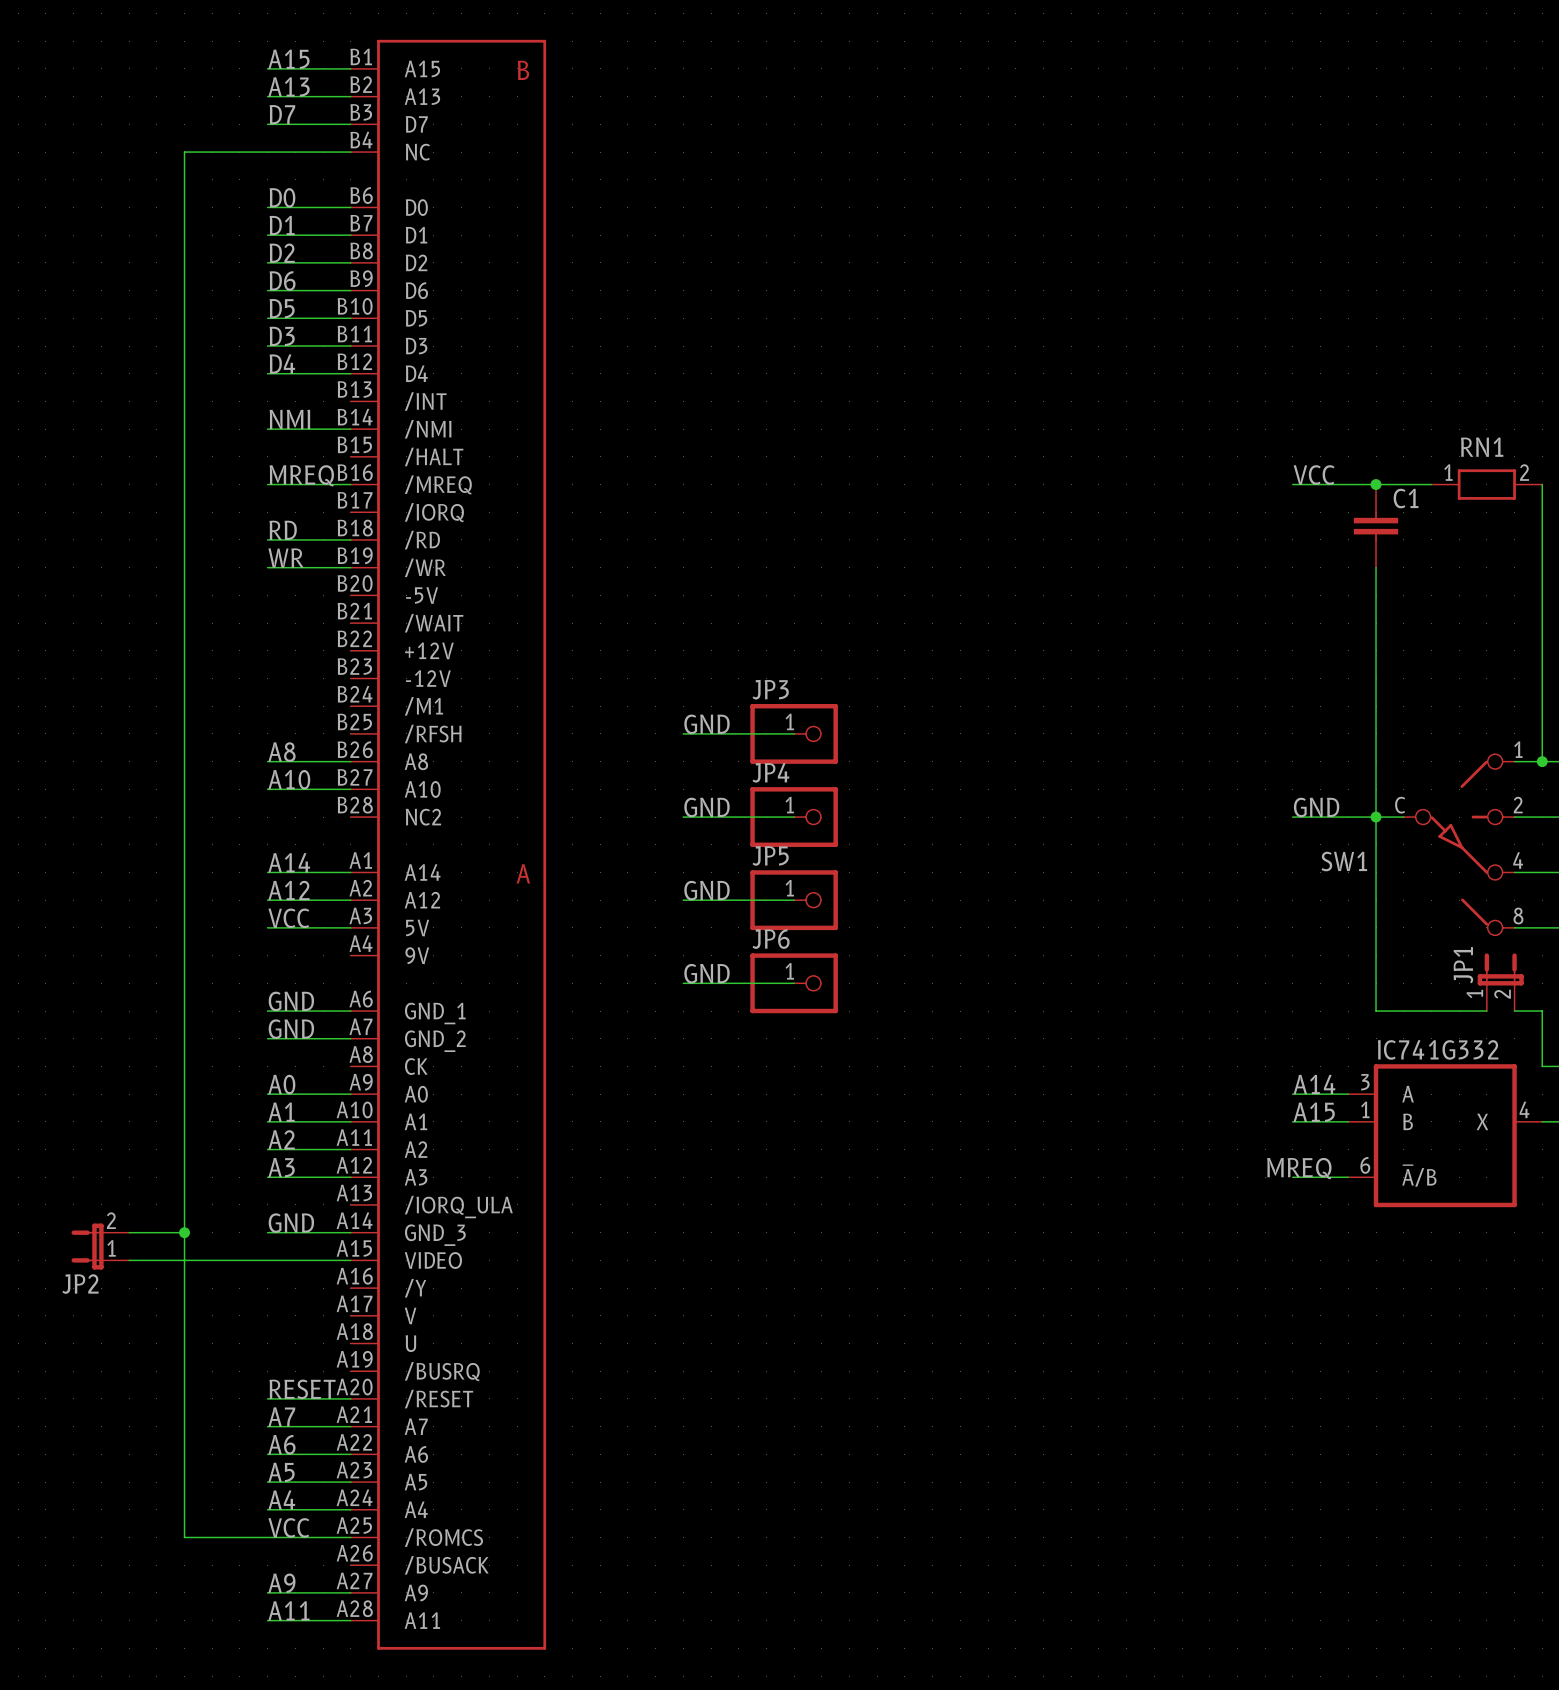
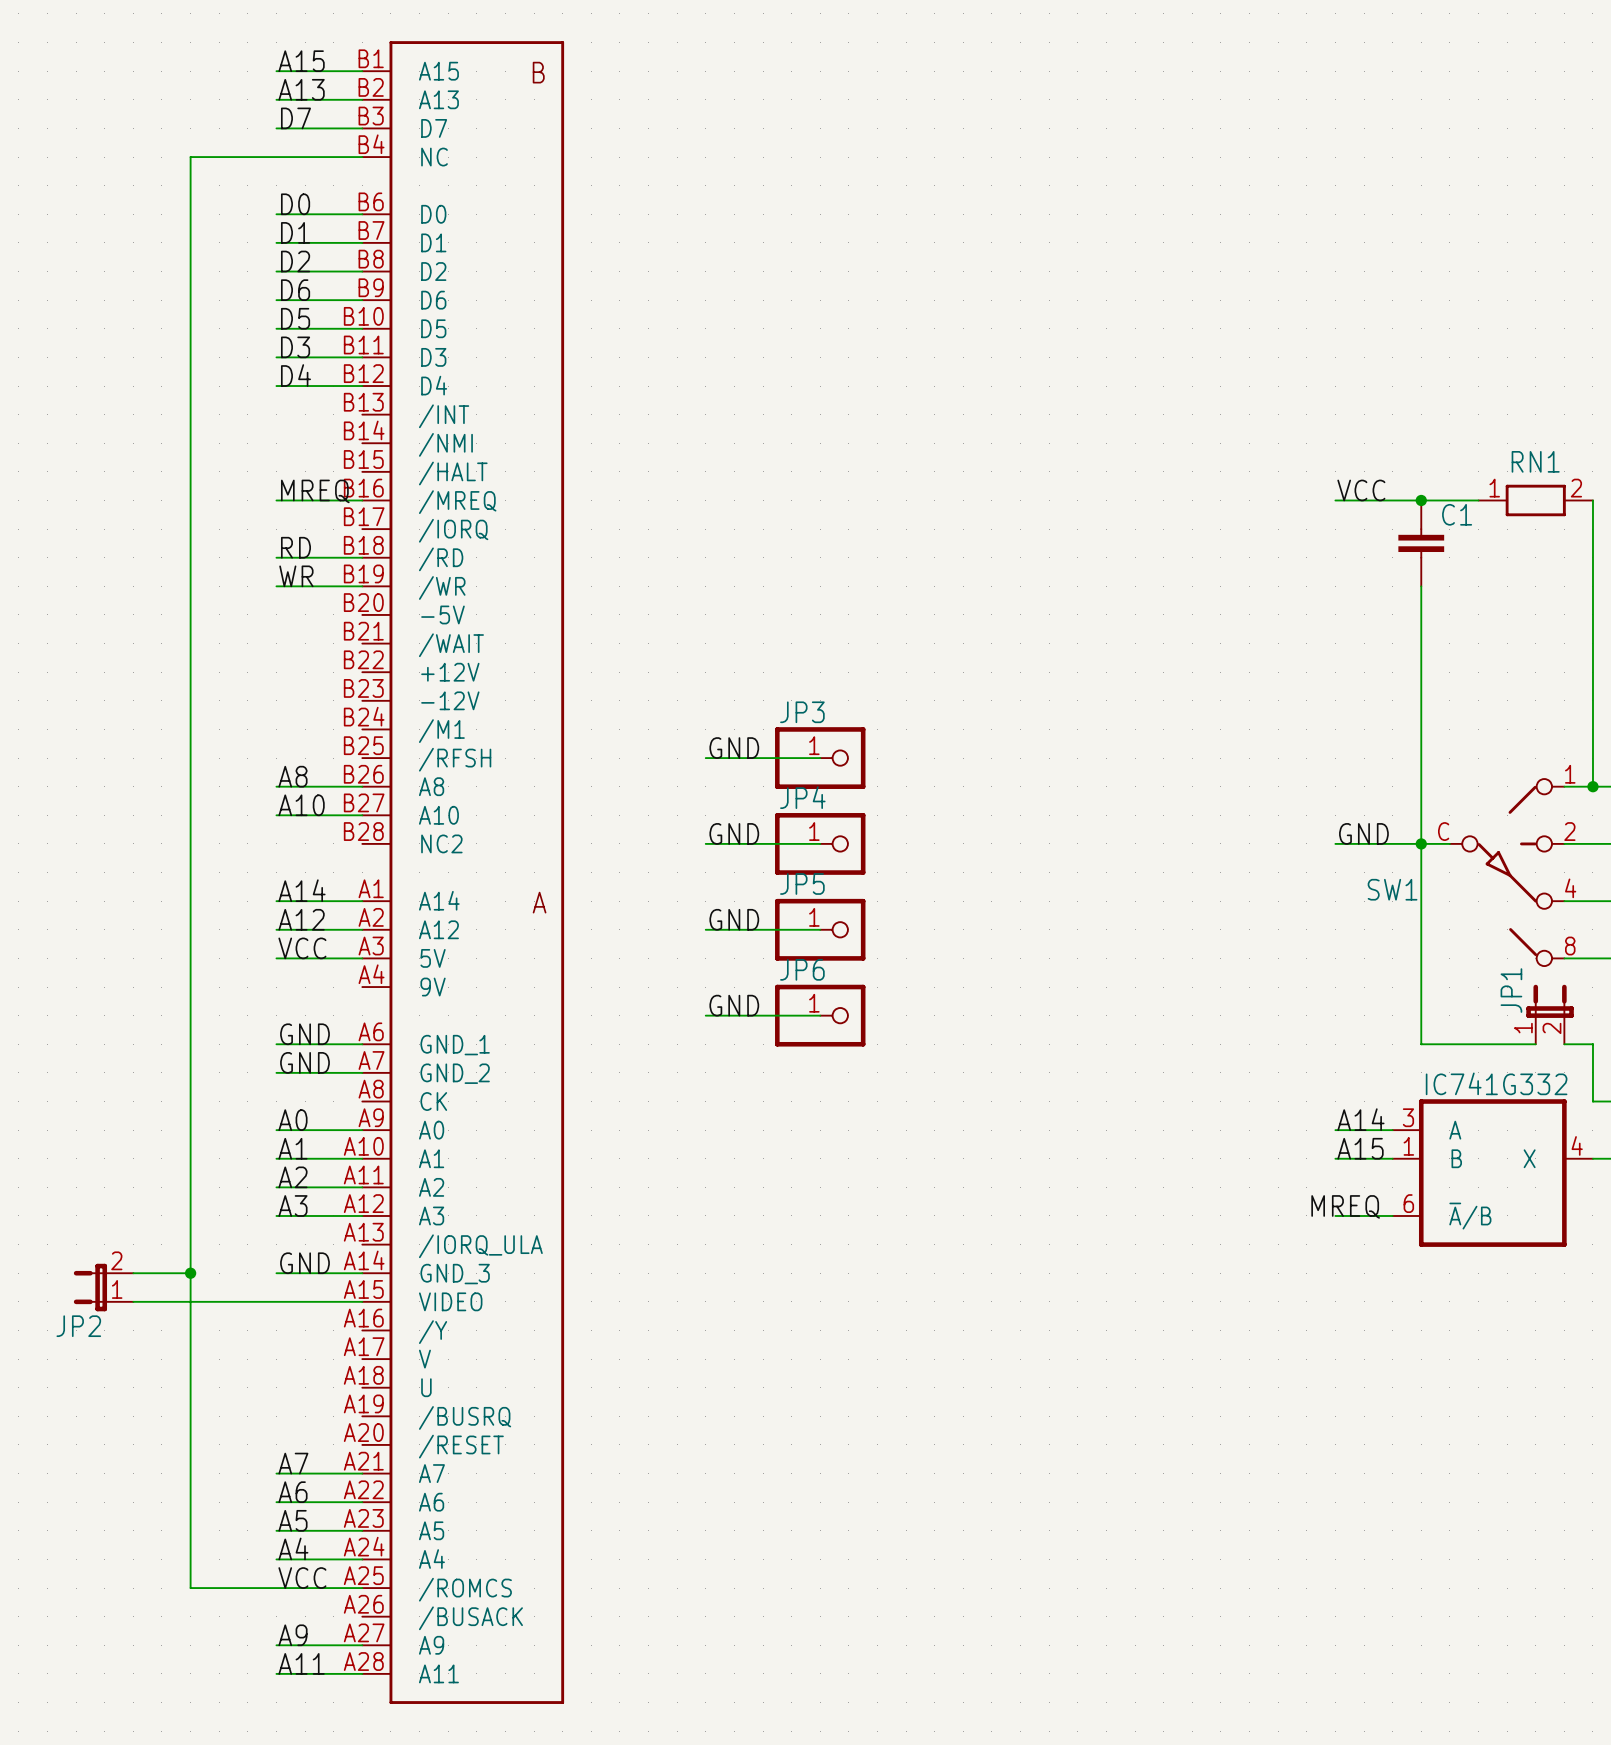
label: NMI (289, 419) -> none
wire: (267, 429) (350, 429) -> none
label: RESET (302, 1389) -> none
wire: (267, 1398) (350, 1398) -> none

